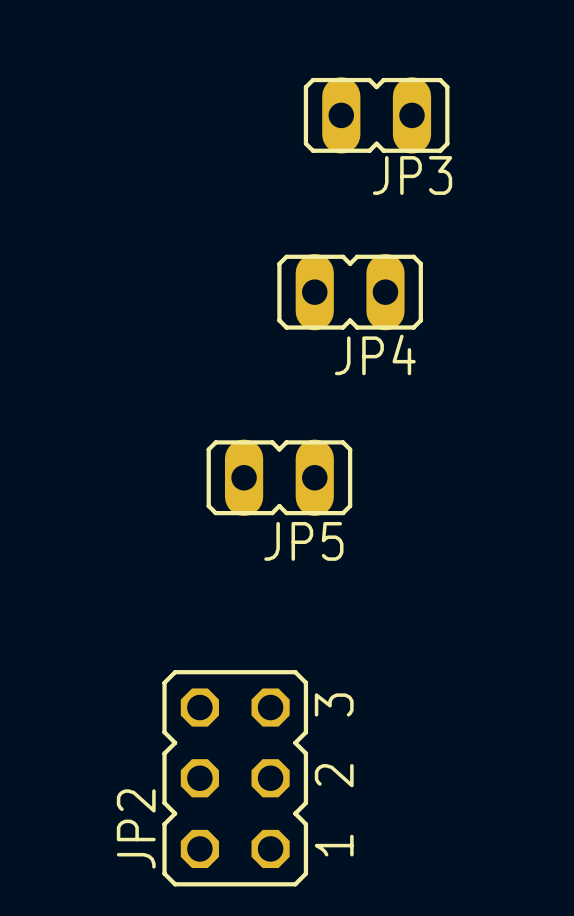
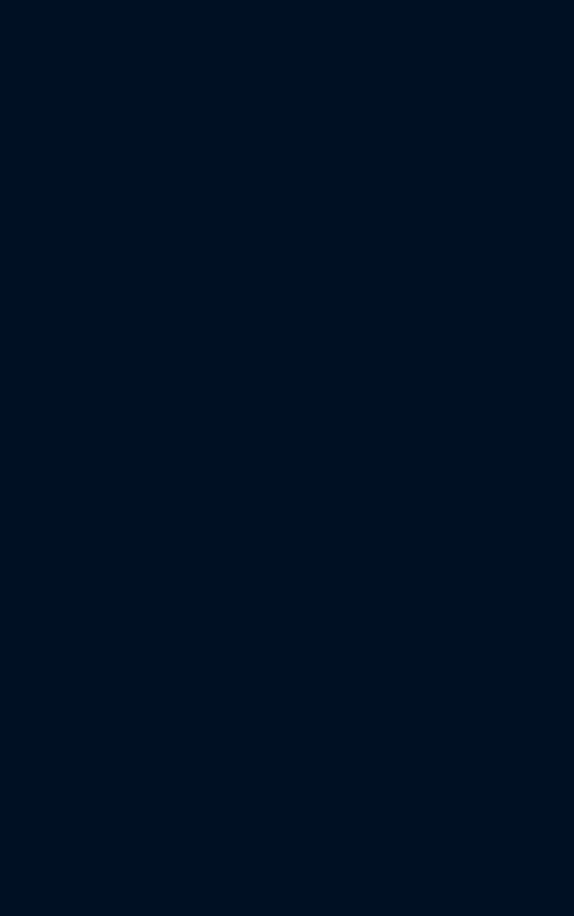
JP3: (376, 115) -> none
JP4: (350, 292) -> none
JP5: (279, 477) -> none
JP2: (235, 778) -> none

